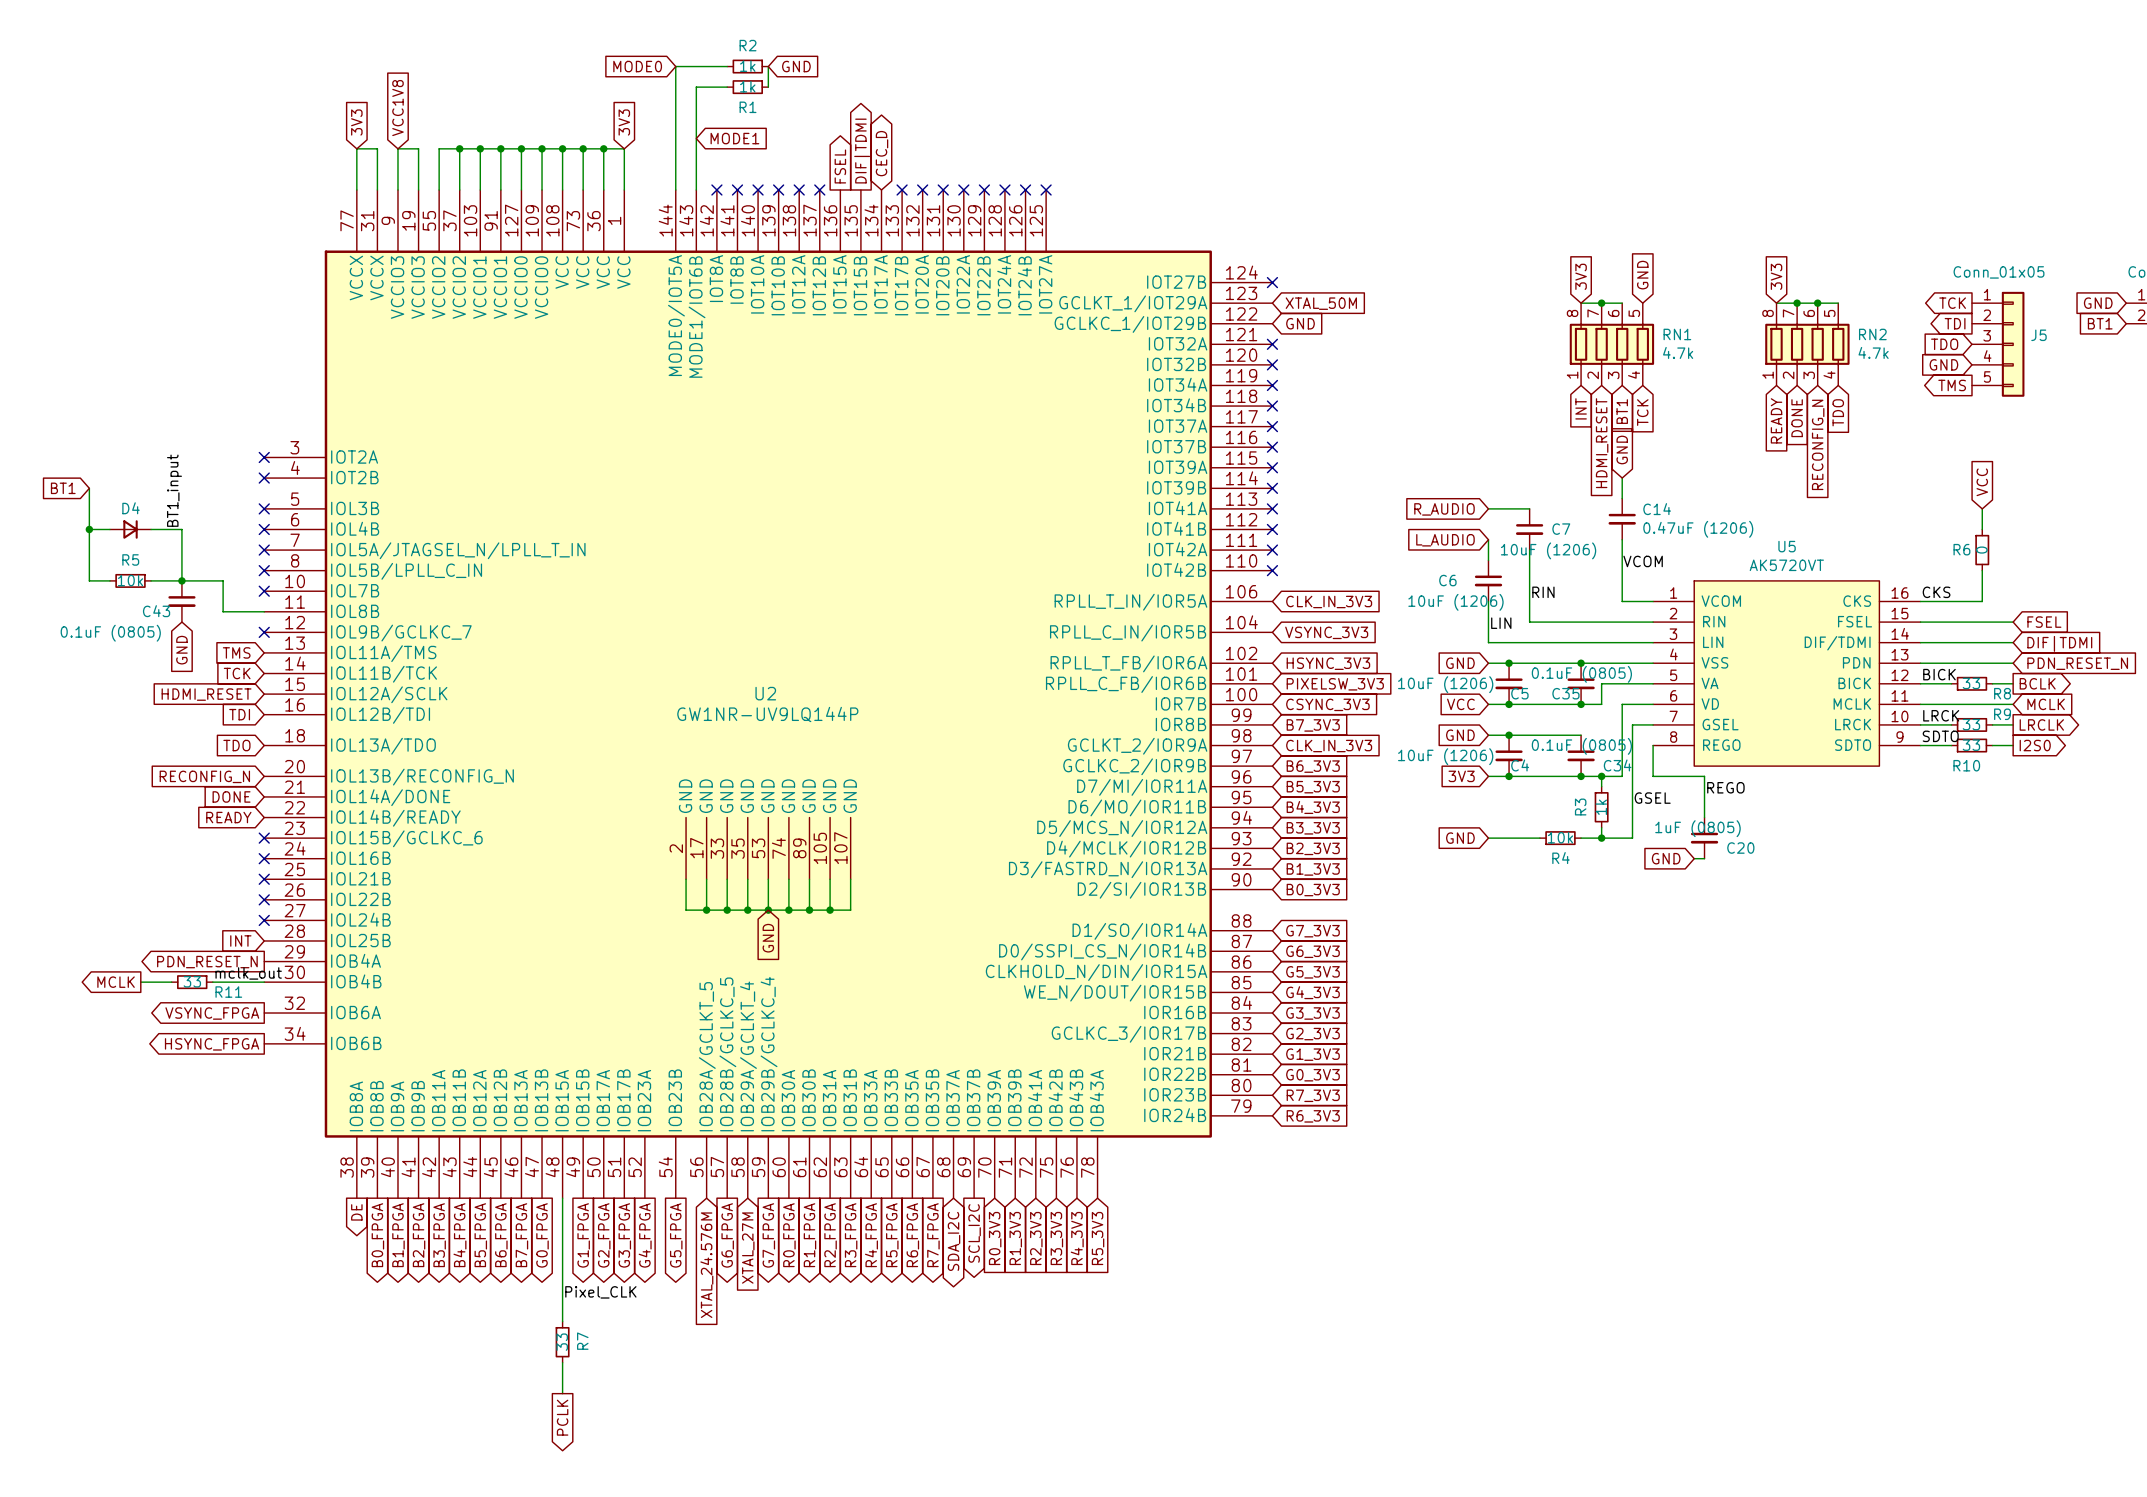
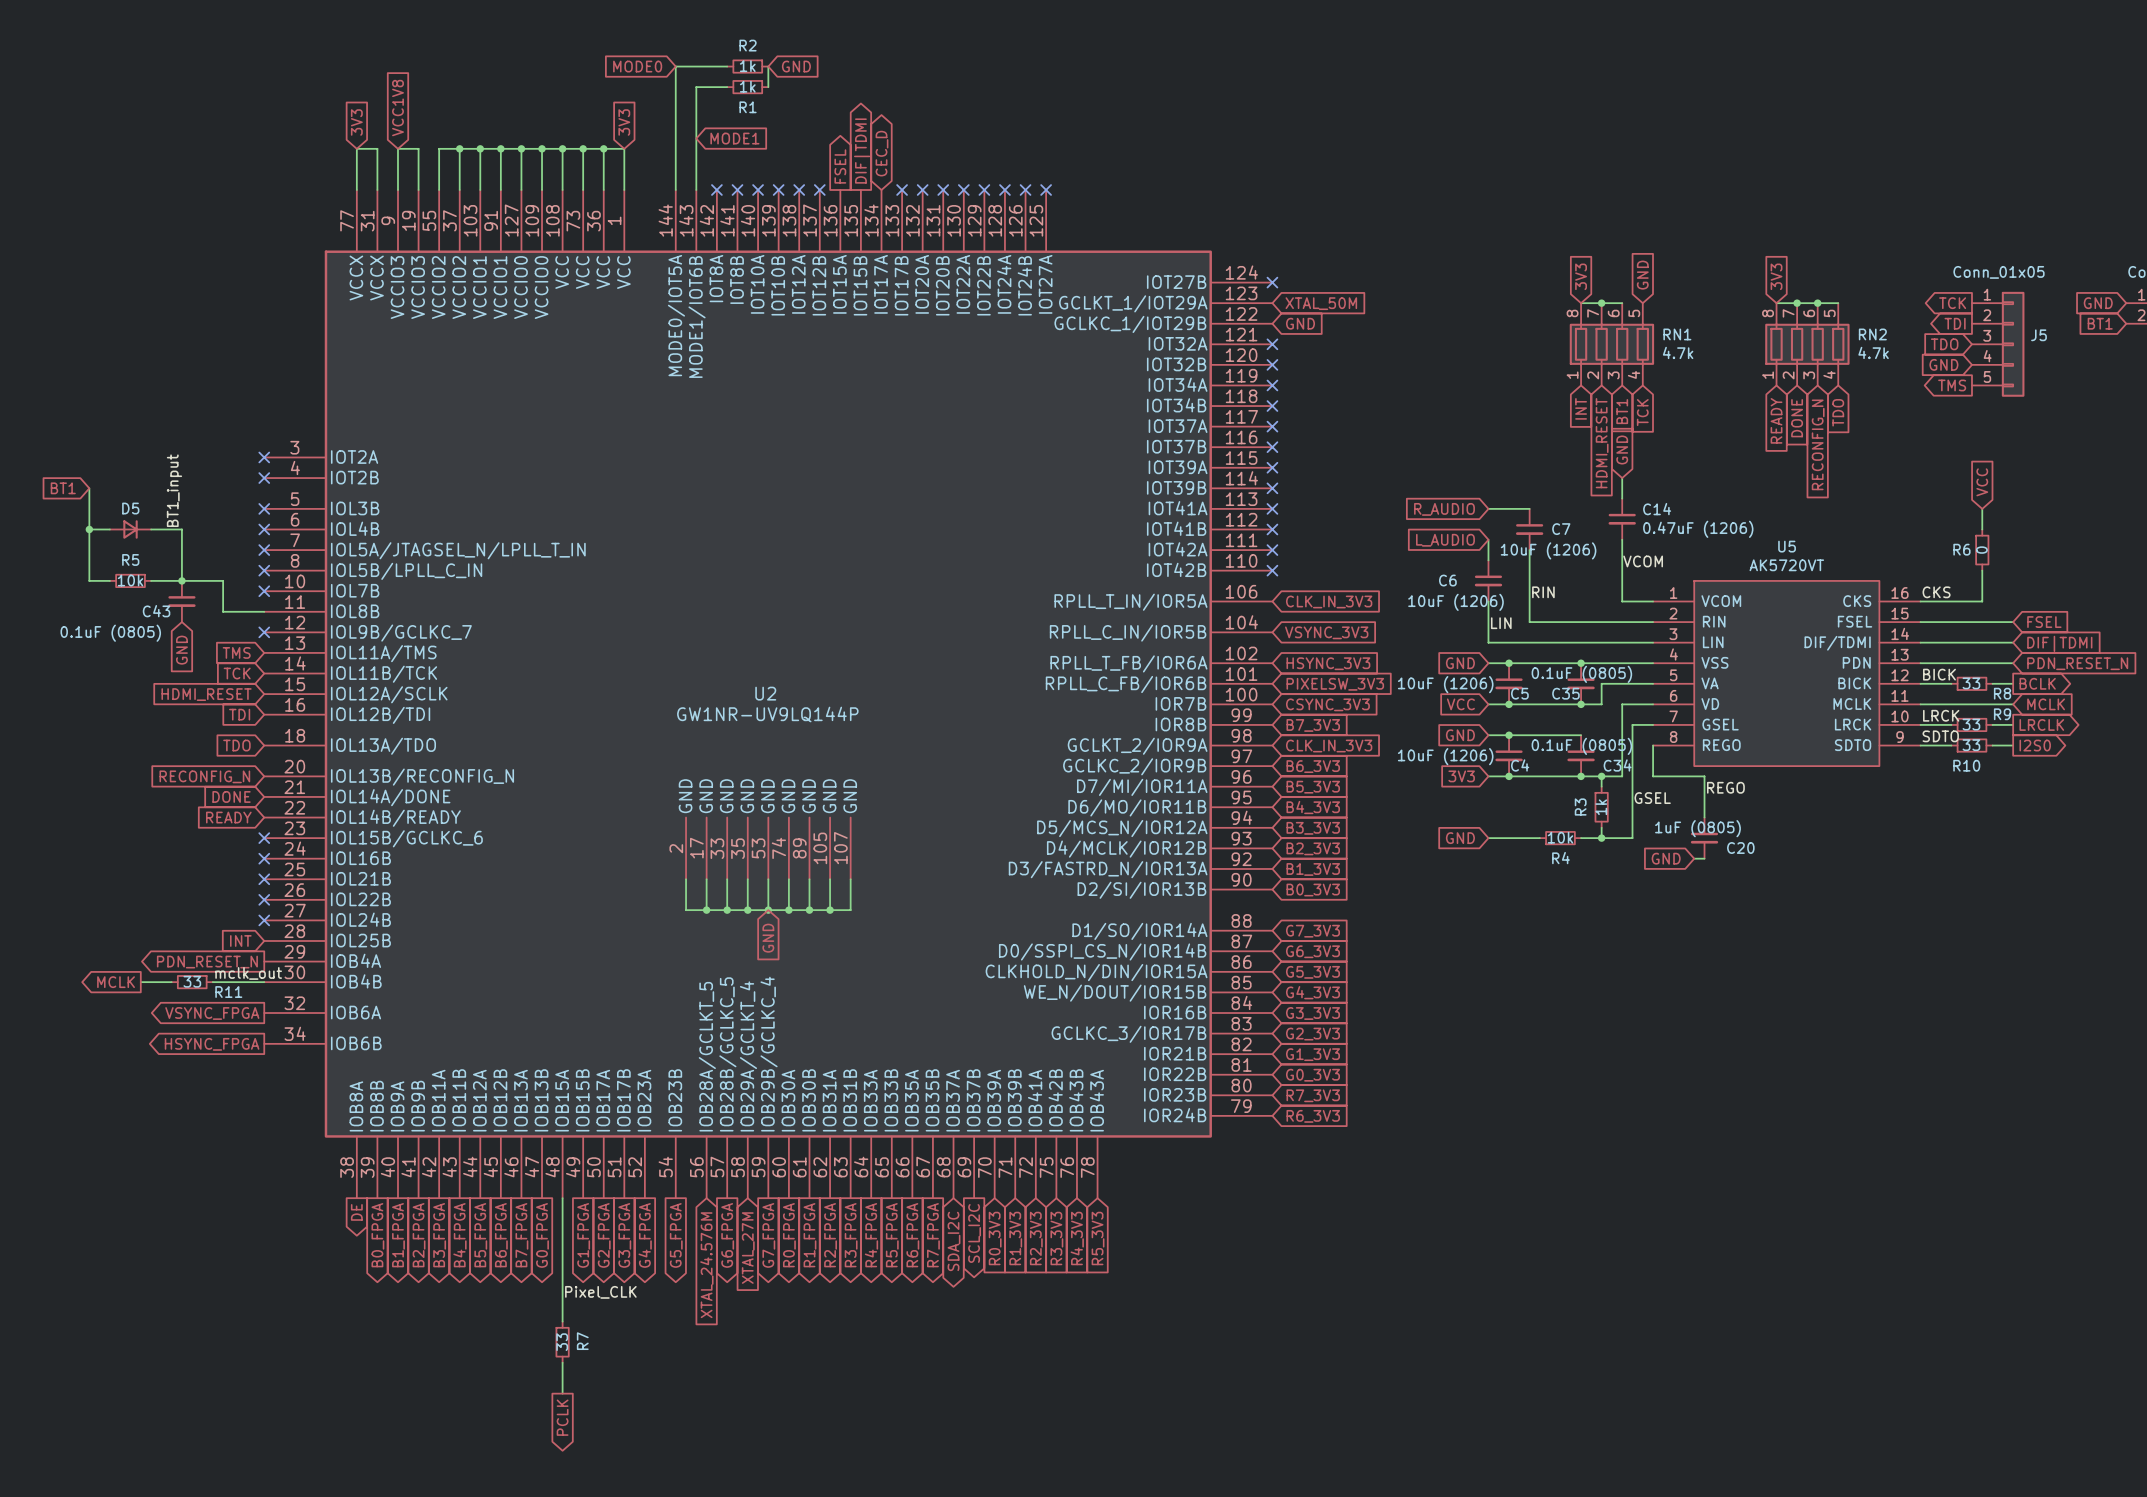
D4 name: D4 (131, 508) -> D5 (130, 508)

